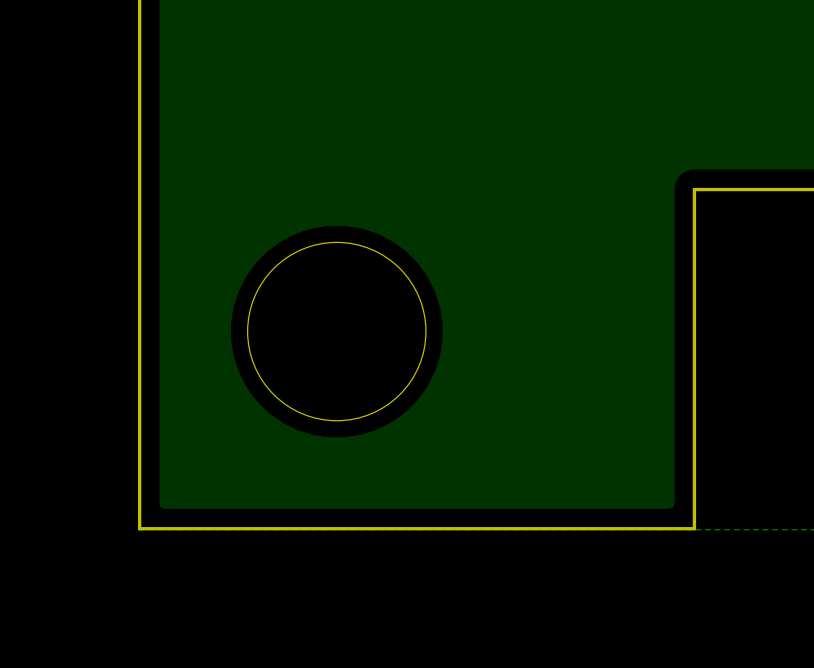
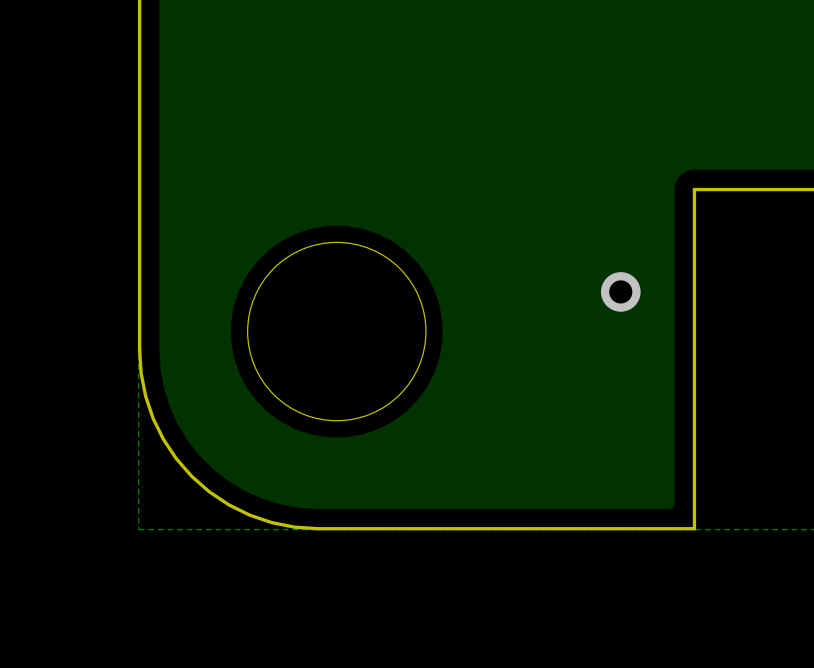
via: none -> (620, 291)
board edge: (139, 350) (139, 528) (317, 528) -> (139, 350) (141, 373) (145, 396) (153, 418) (163, 439) (176, 458) (191, 476) (209, 491) (228, 504) (249, 515) (271, 522) (294, 527) (317, 528)

